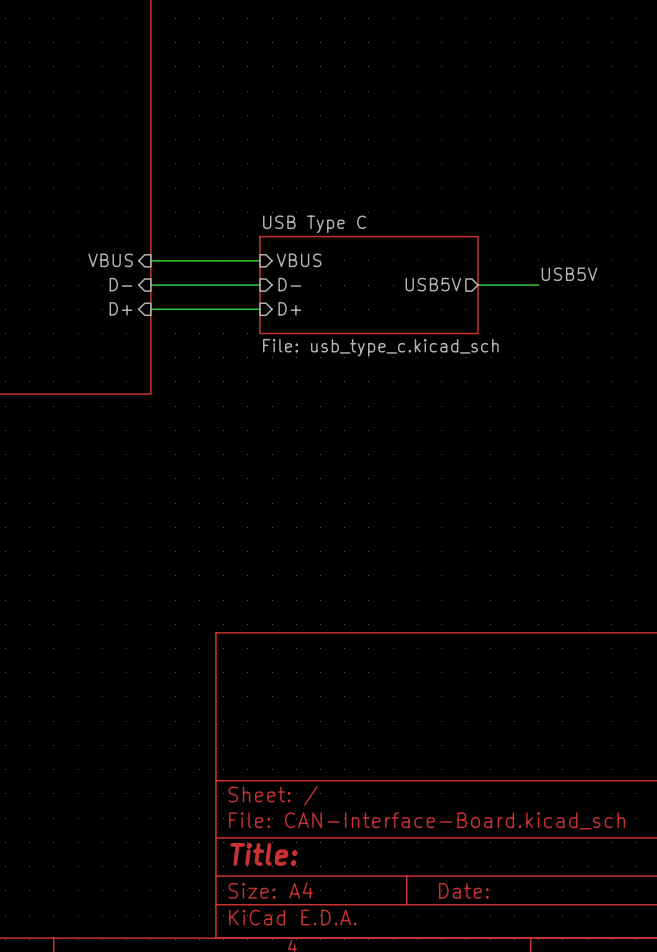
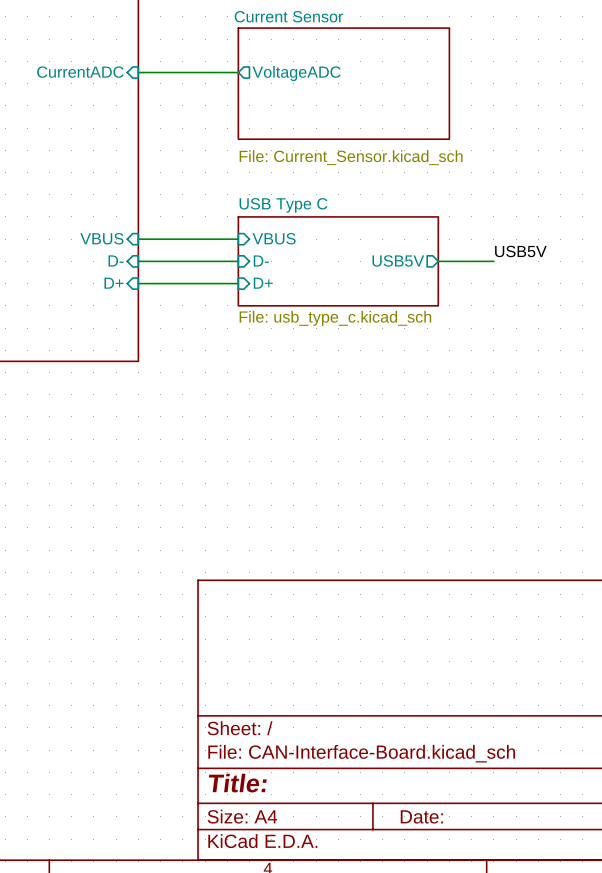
sheet pin: none -> CurrentADC (80, 72)
wire: none -> (138, 72) (238, 72)
sheet pin: none -> VoltageADC (296, 73)
sheet Current Sensor: none -> File: Current_Sensor.kicad_sch (343, 83)

